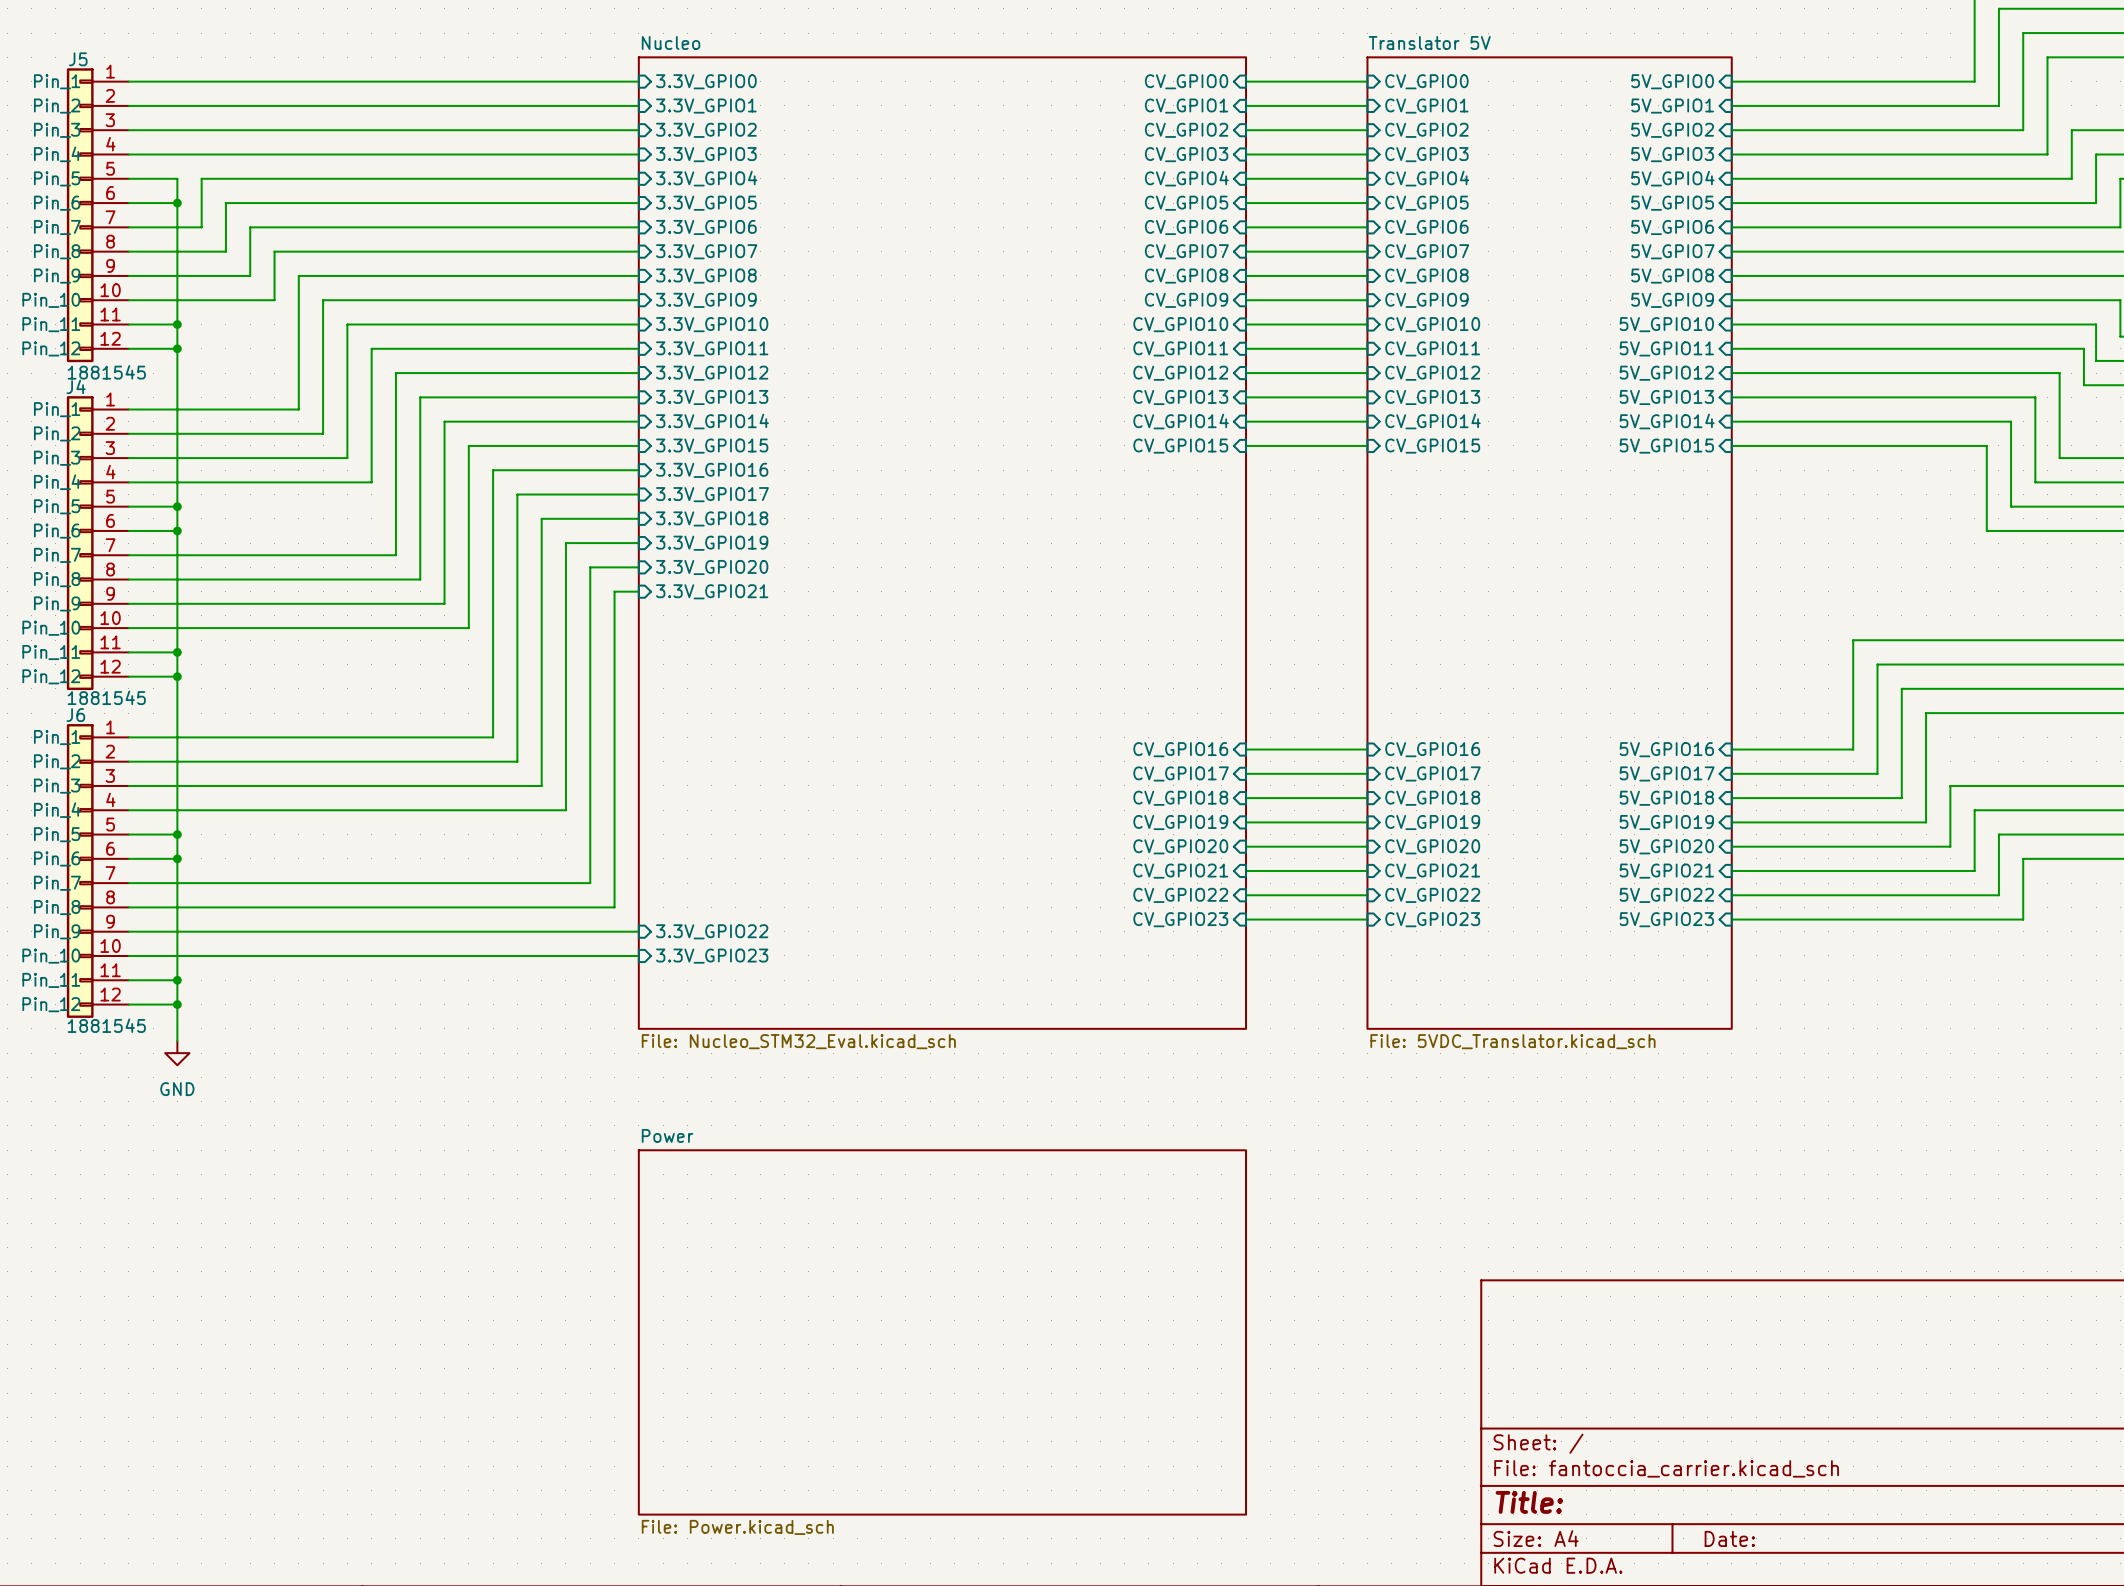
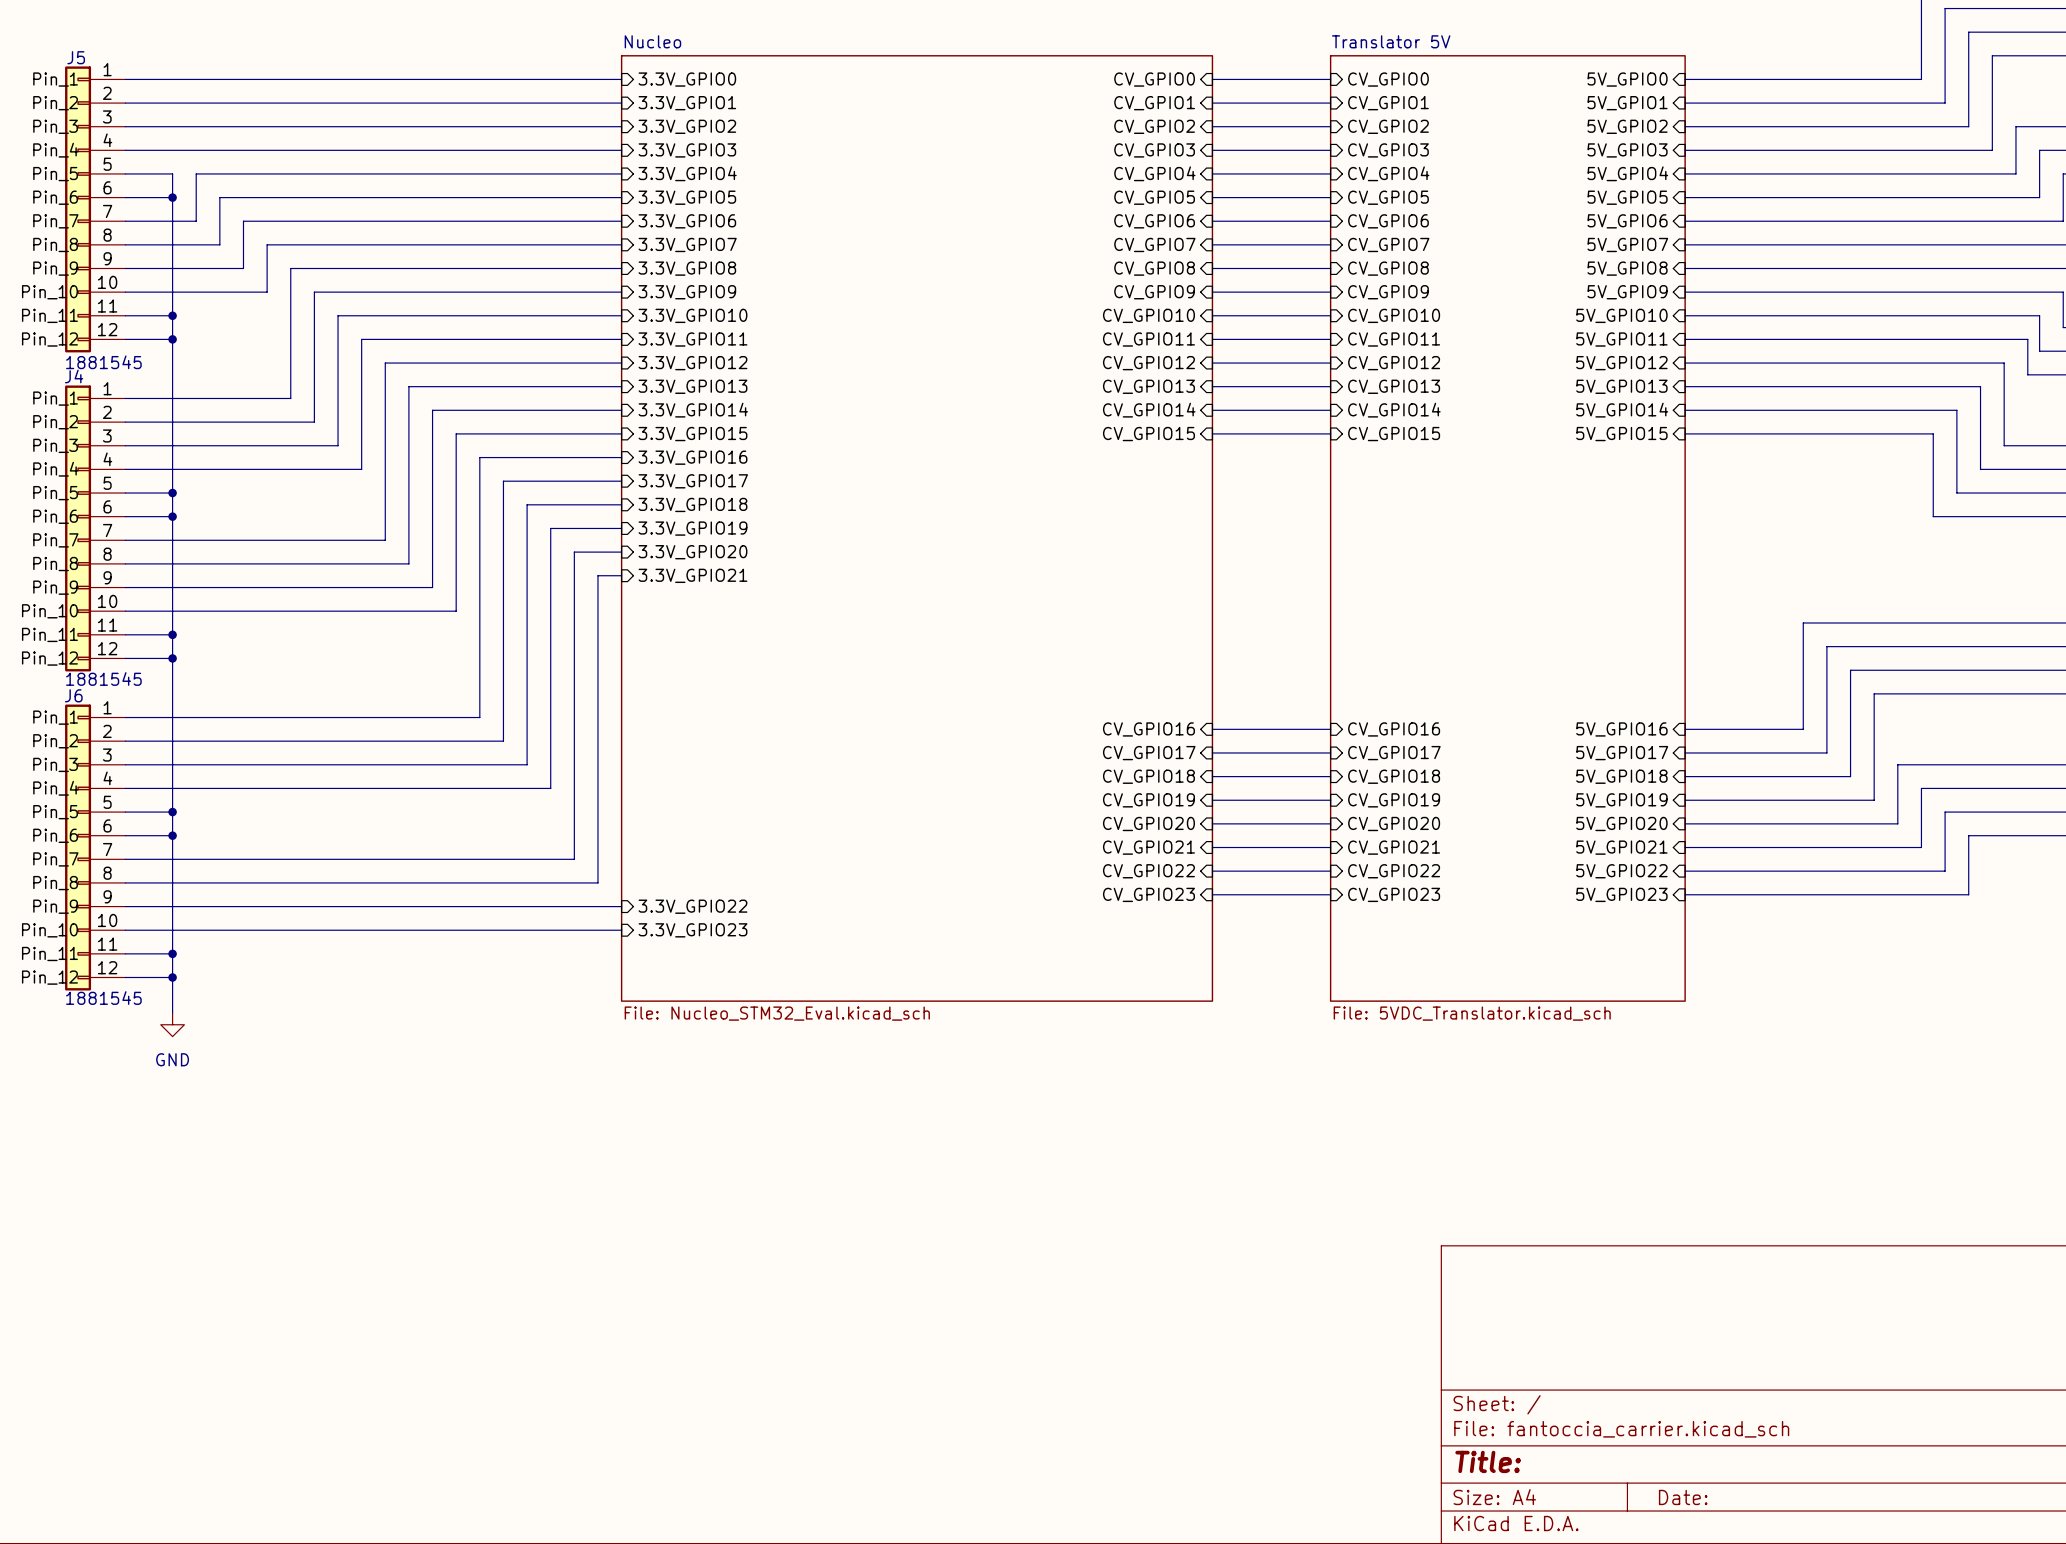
sheet Power: File: Power.kicad_sch (942, 1332) -> none

